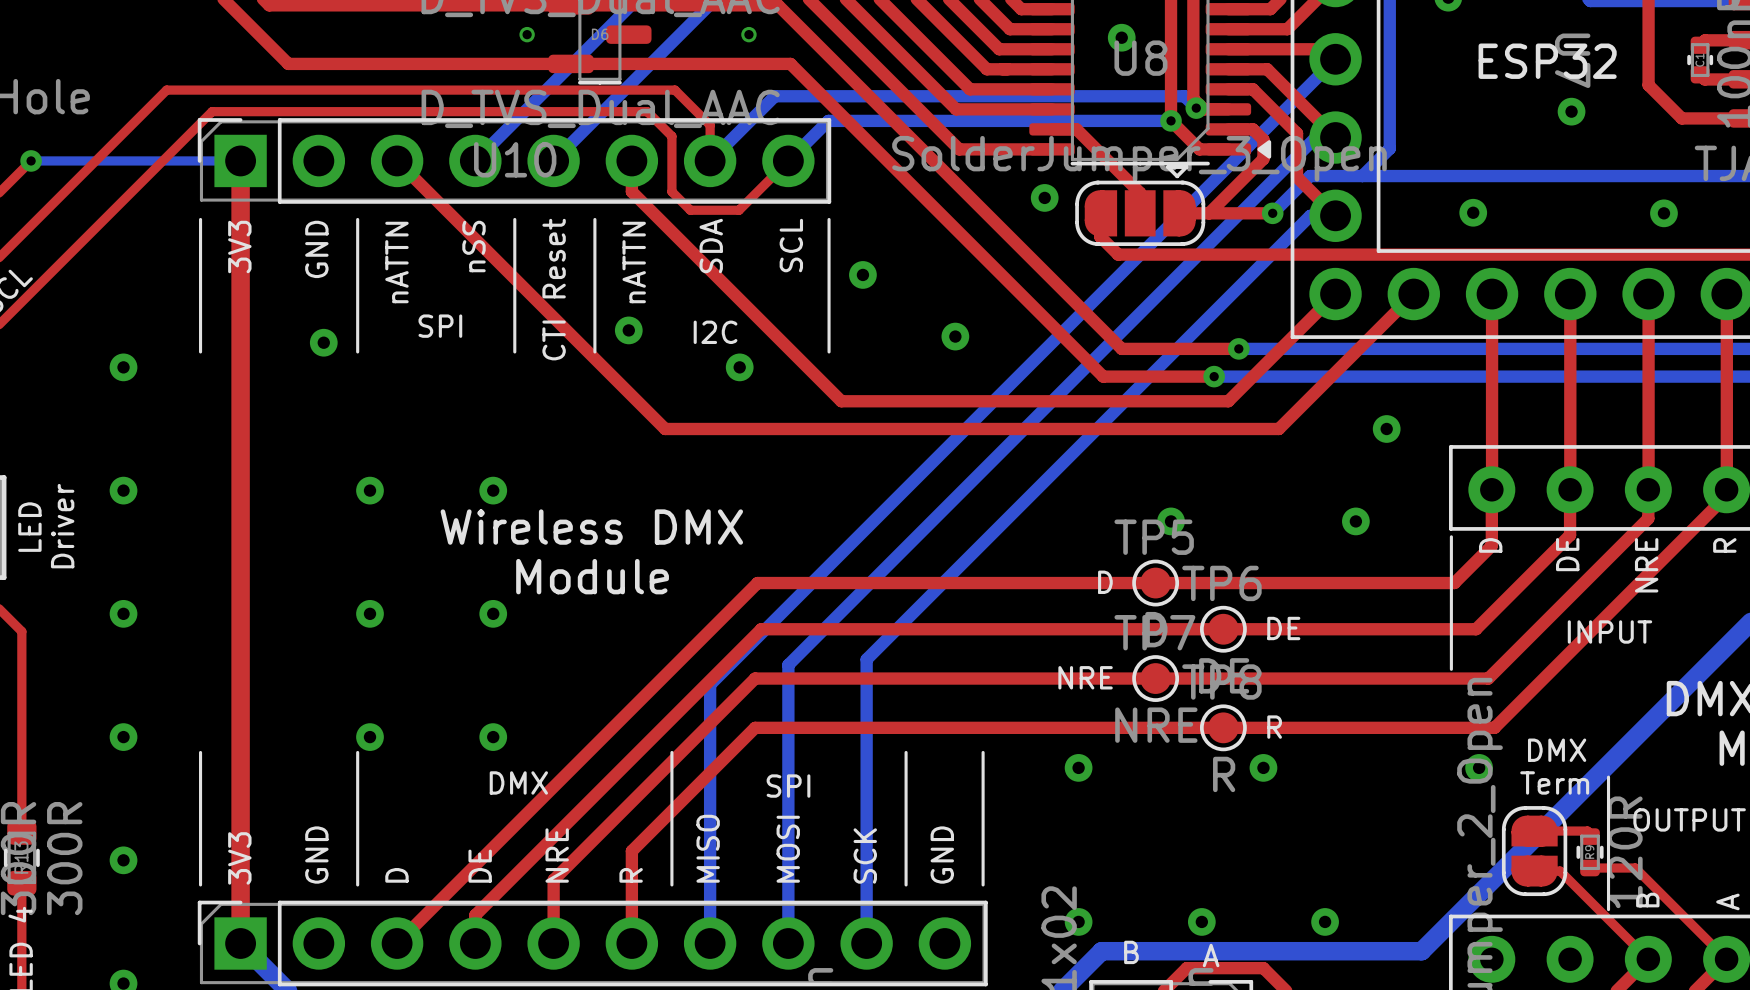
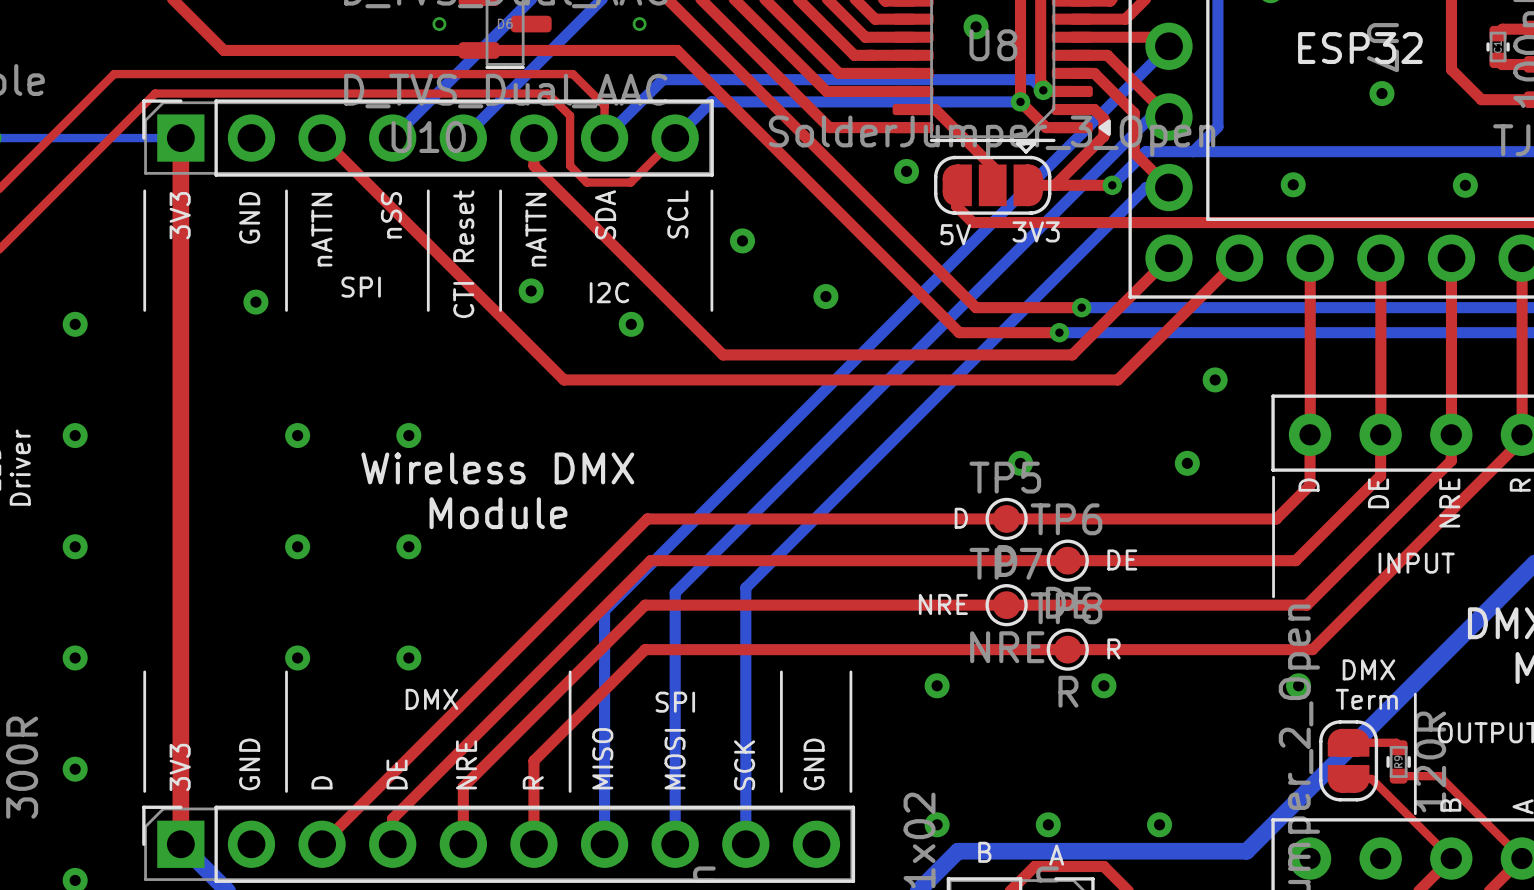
text: none -> 3V3 (1036, 231)
text: none -> 5V (955, 234)

